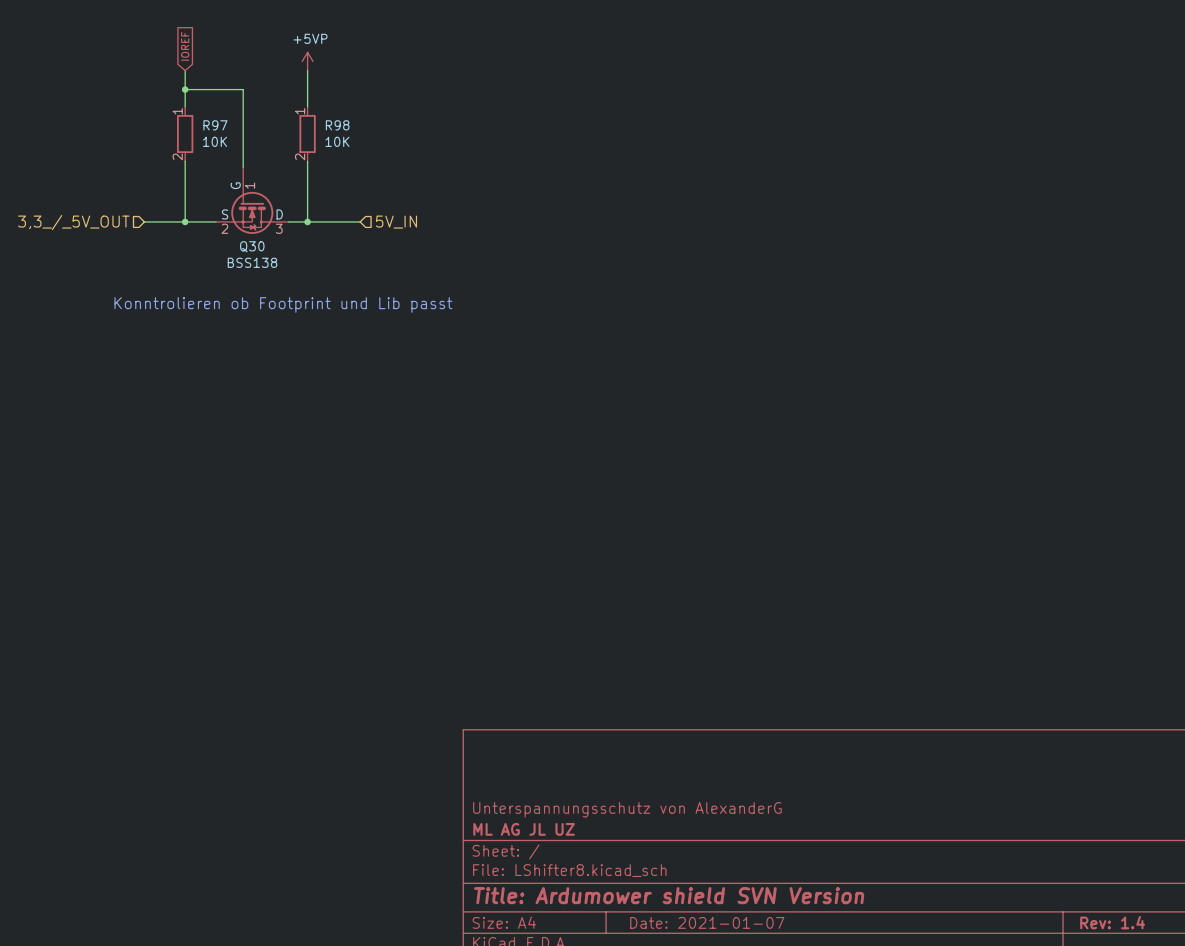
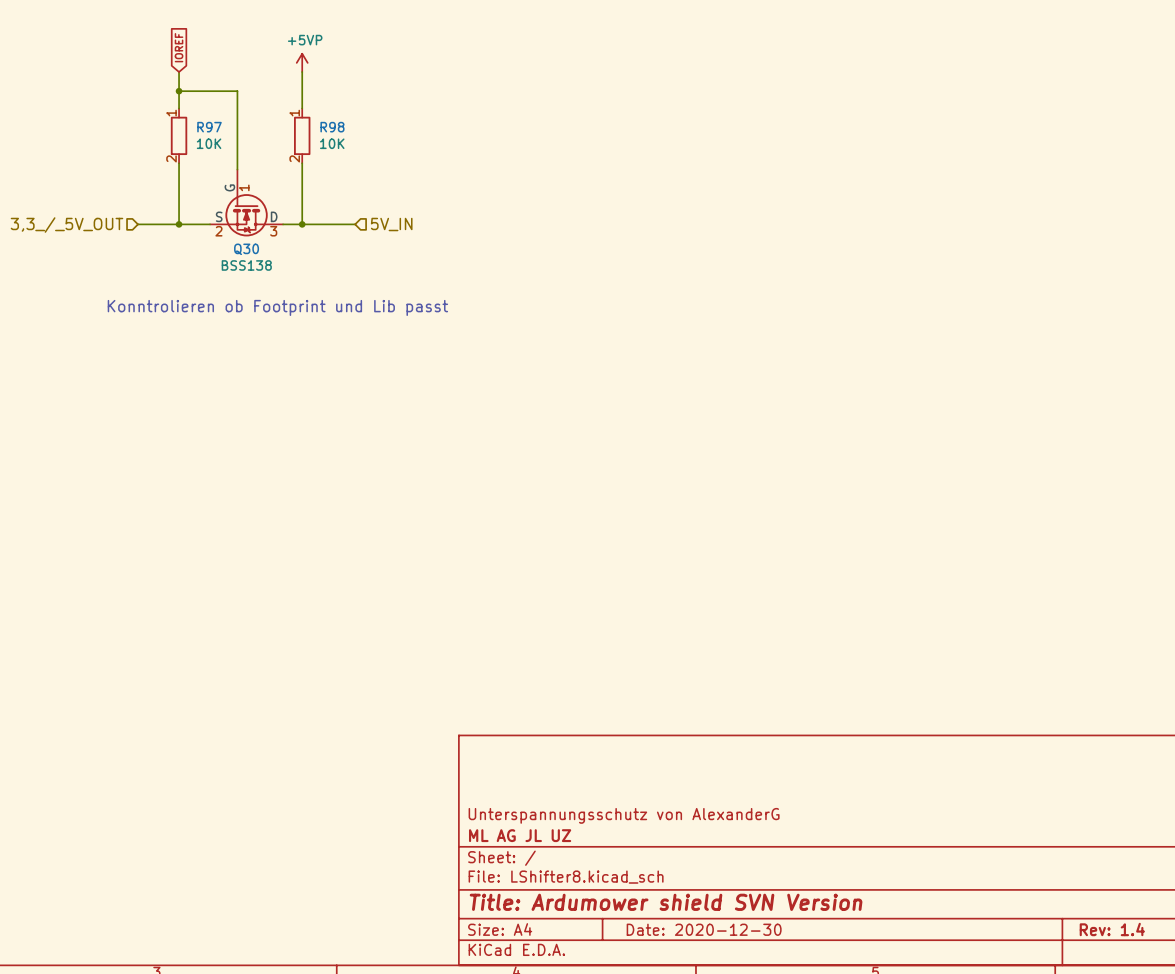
title block: Date: 2021-01-07 (707, 922) -> Date: 2020-12-30 (704, 929)

